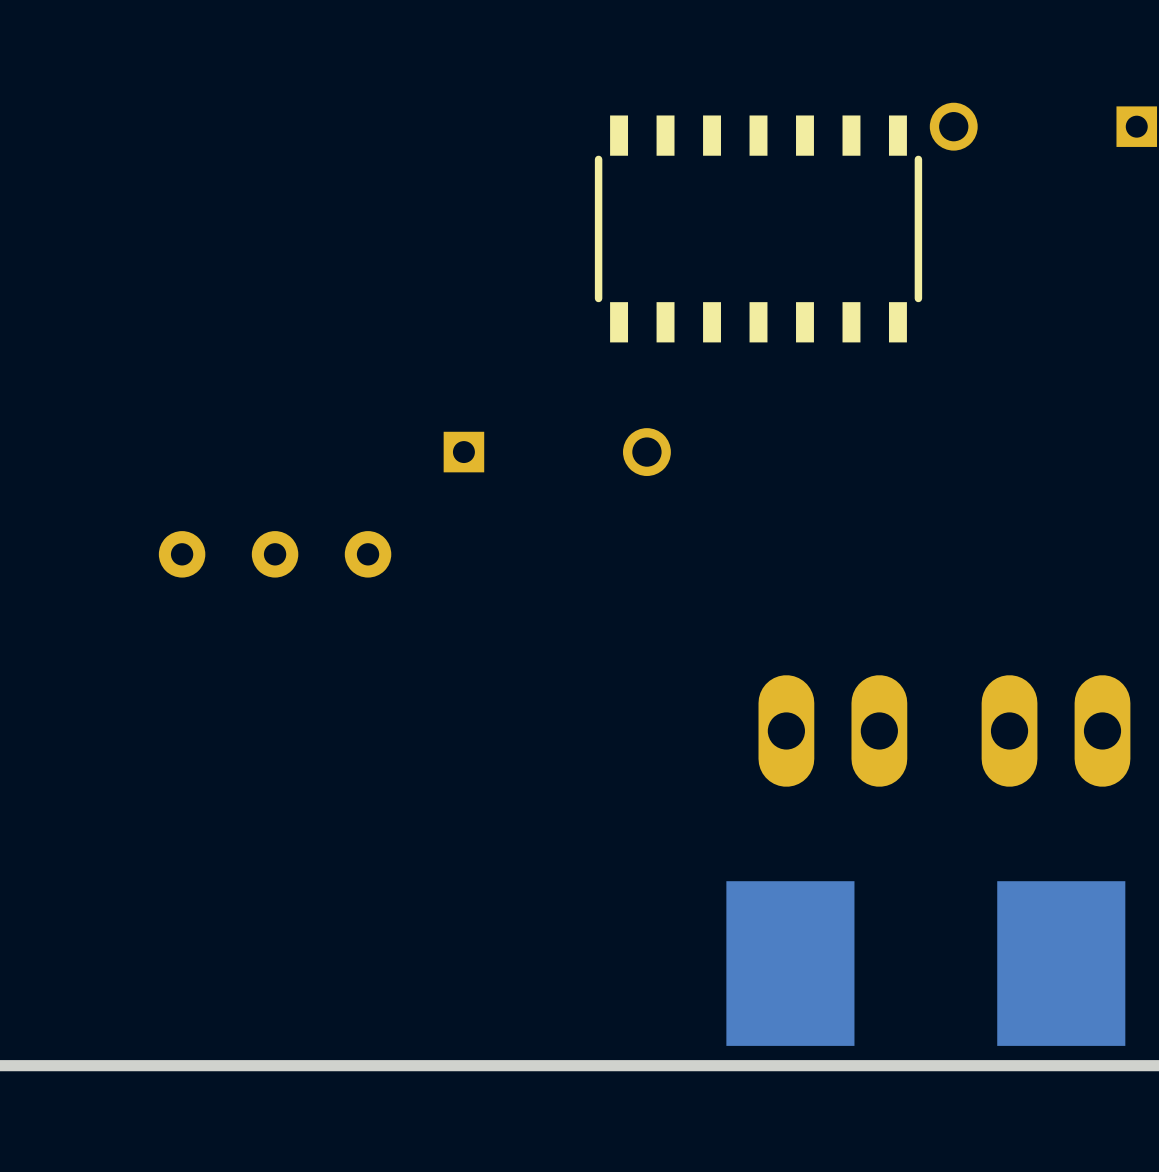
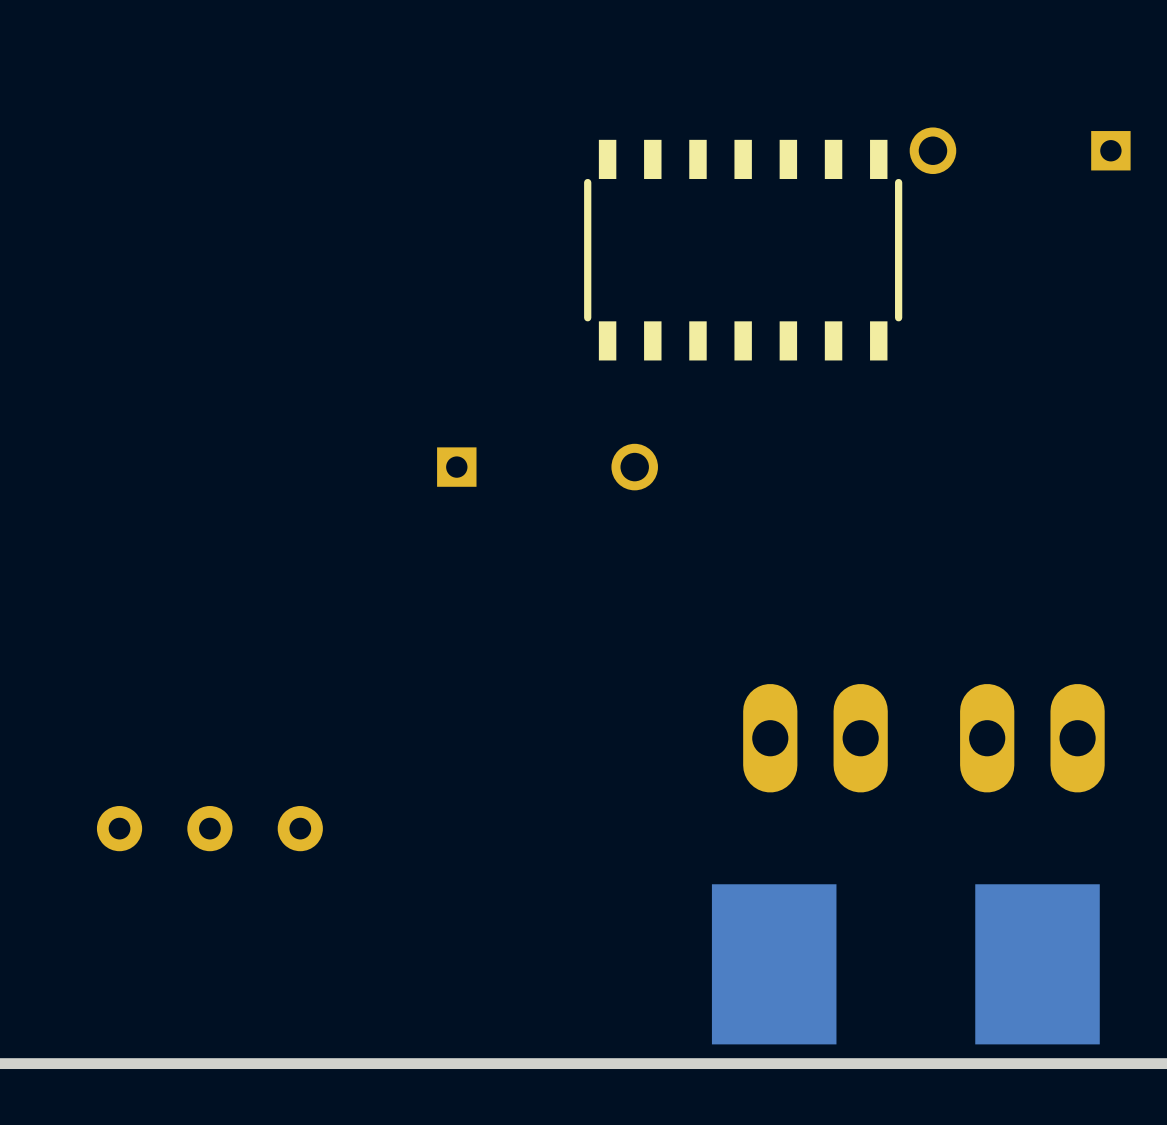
part position: (275, 554) -> (209, 828)

